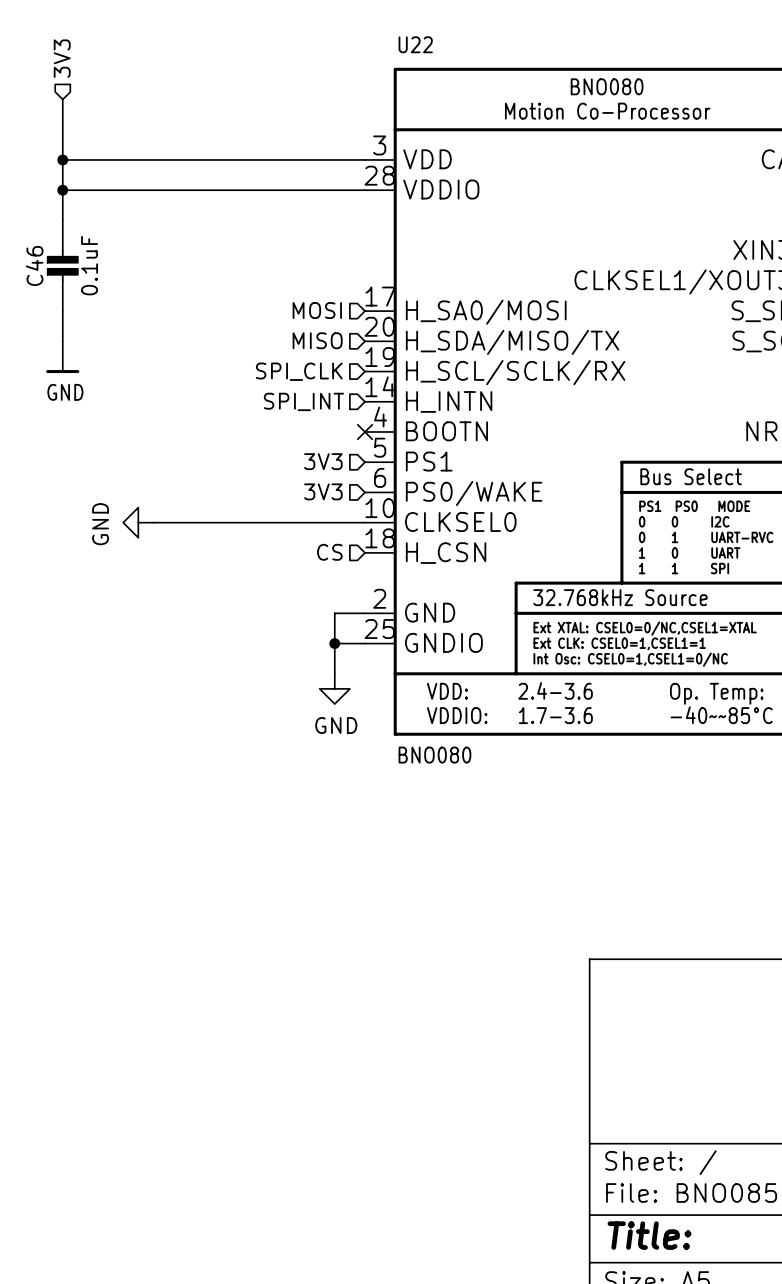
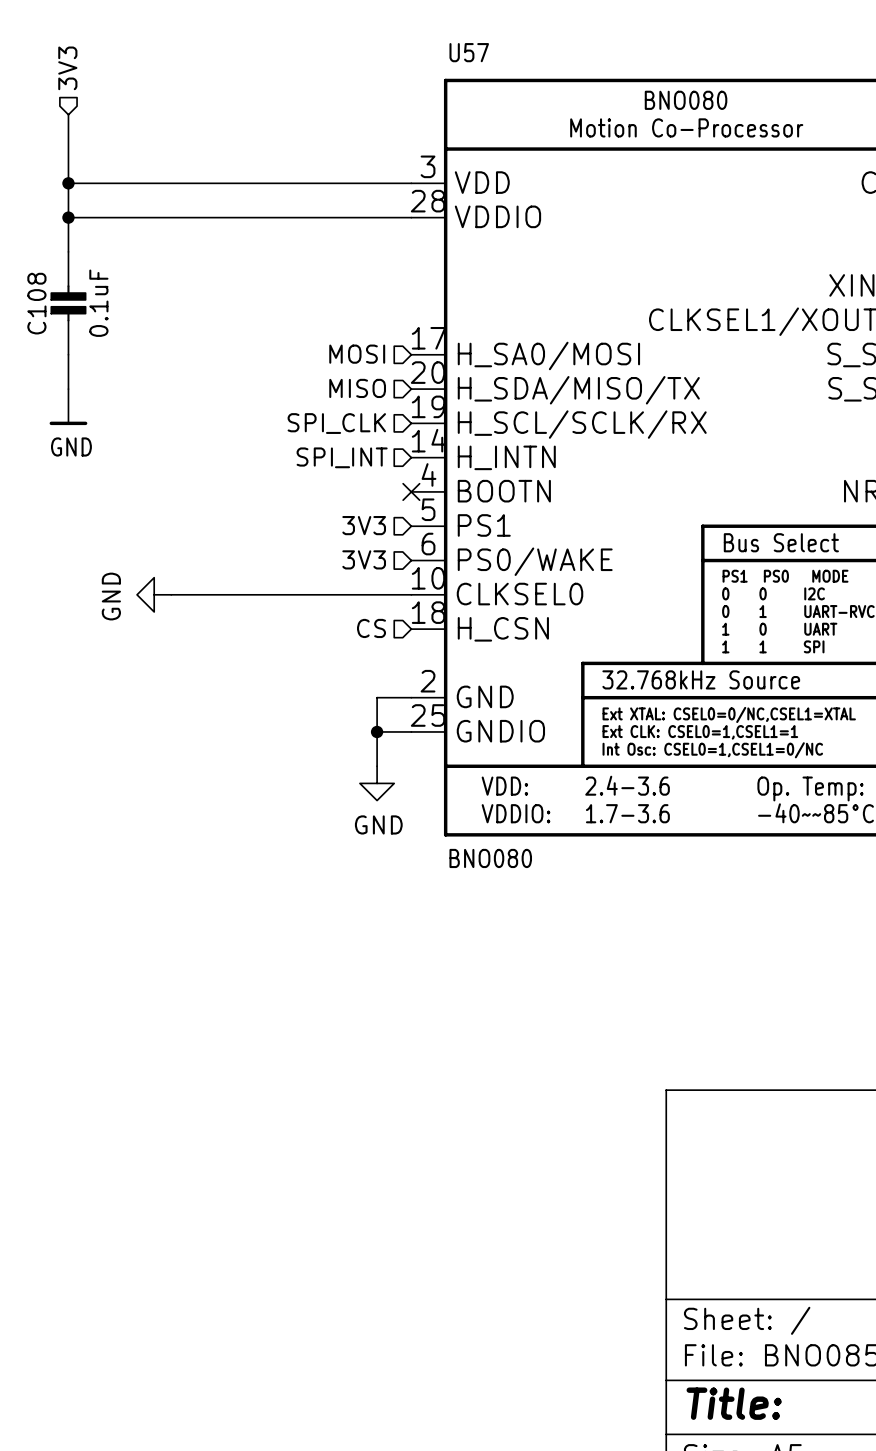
U22 name: U22 (415, 44) -> U57 (469, 52)
C46 name: C46 (34, 266) -> C108 (36, 303)

